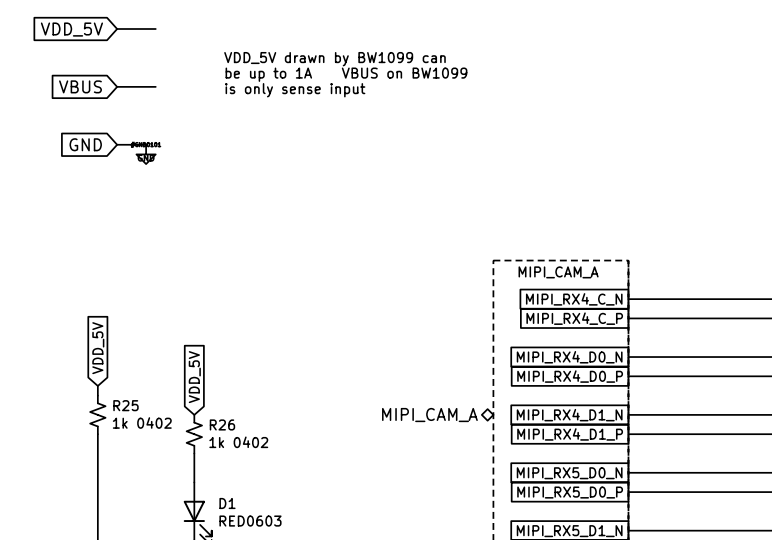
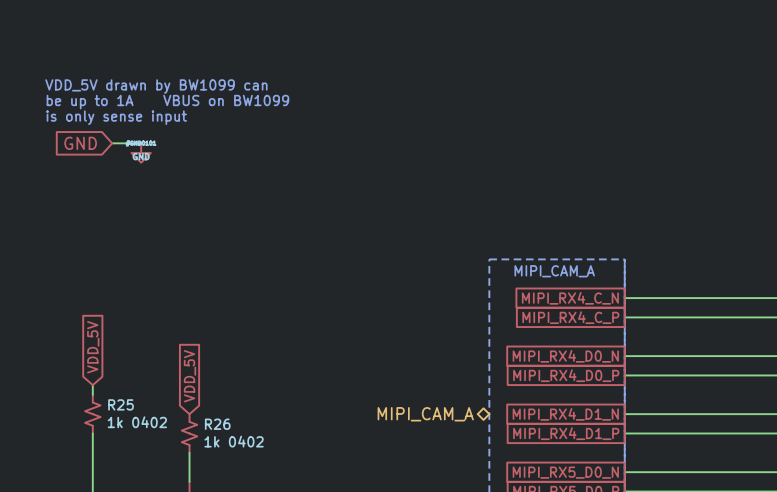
global label: VDD_5V (71, 29) -> none
wire: (117, 29) (155, 29) -> none
text position: VDD_5V drawn by BW1099 can (334, 59) -> VDD_5V drawn by BW1099 can (156, 86)
text position: be up to 1A VBUS on BW1099 (346, 74) -> be up to 1A VBUS on BW1099 (167, 102)
global label: VBUS (80, 86) -> none
wire: (117, 86) (155, 86) -> none
text position: is only sense input (295, 90) -> is only sense input (116, 117)

